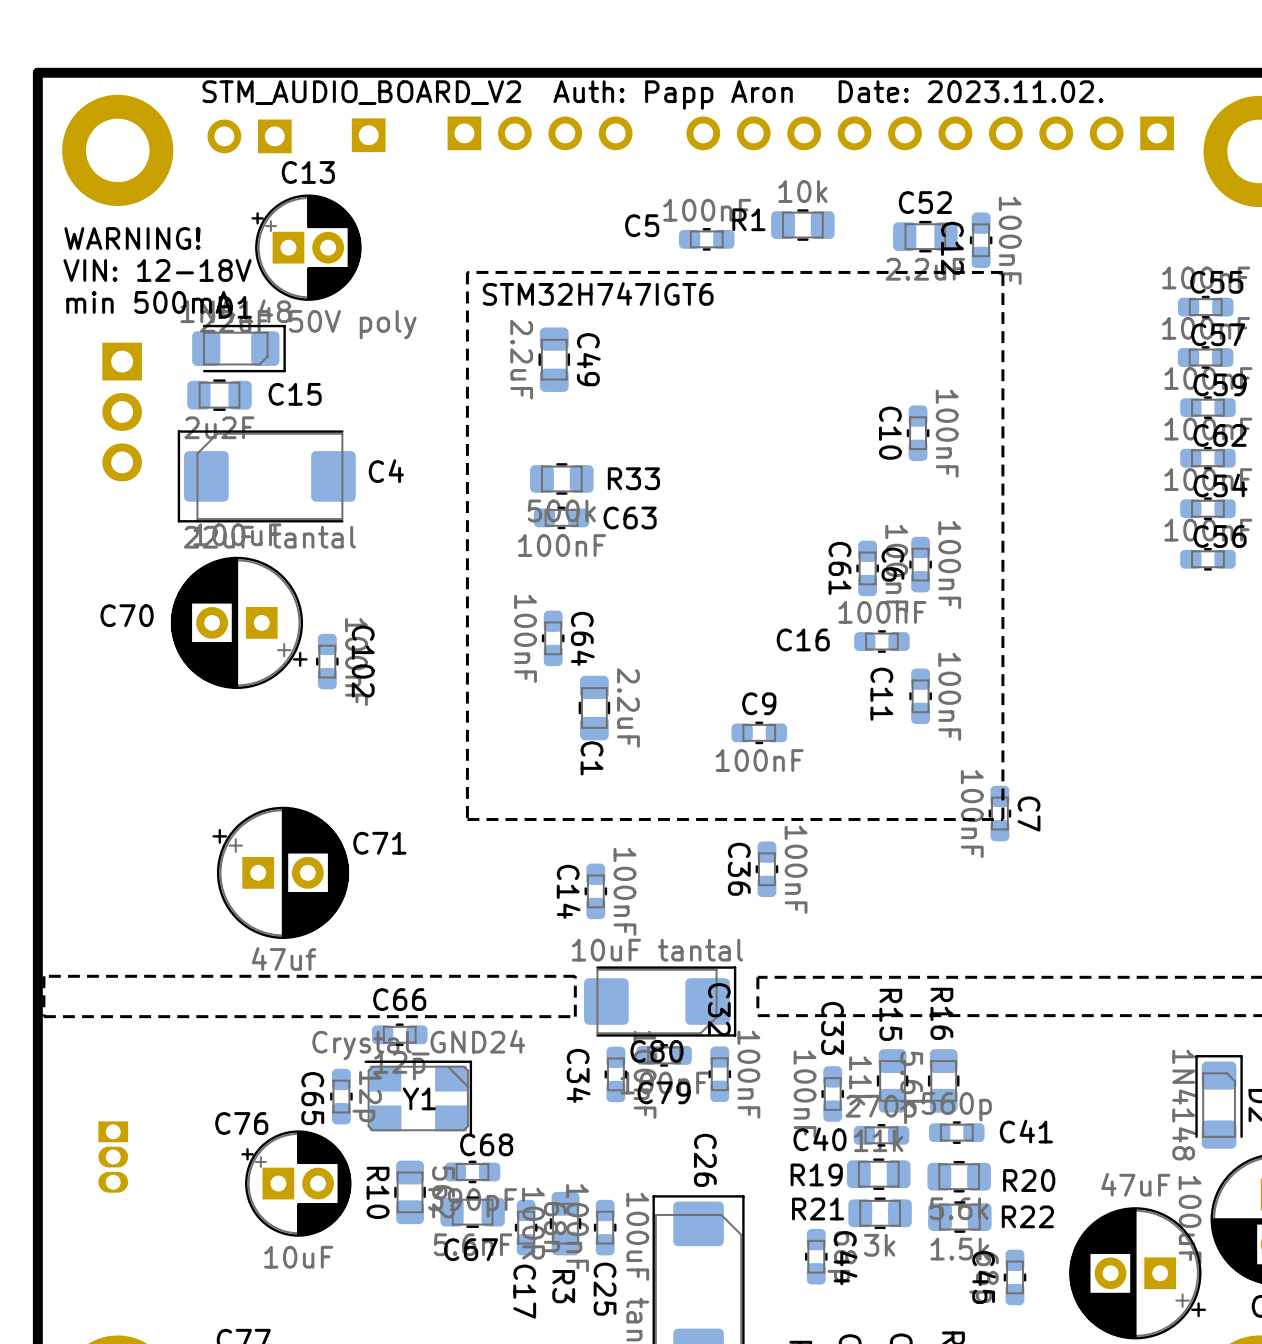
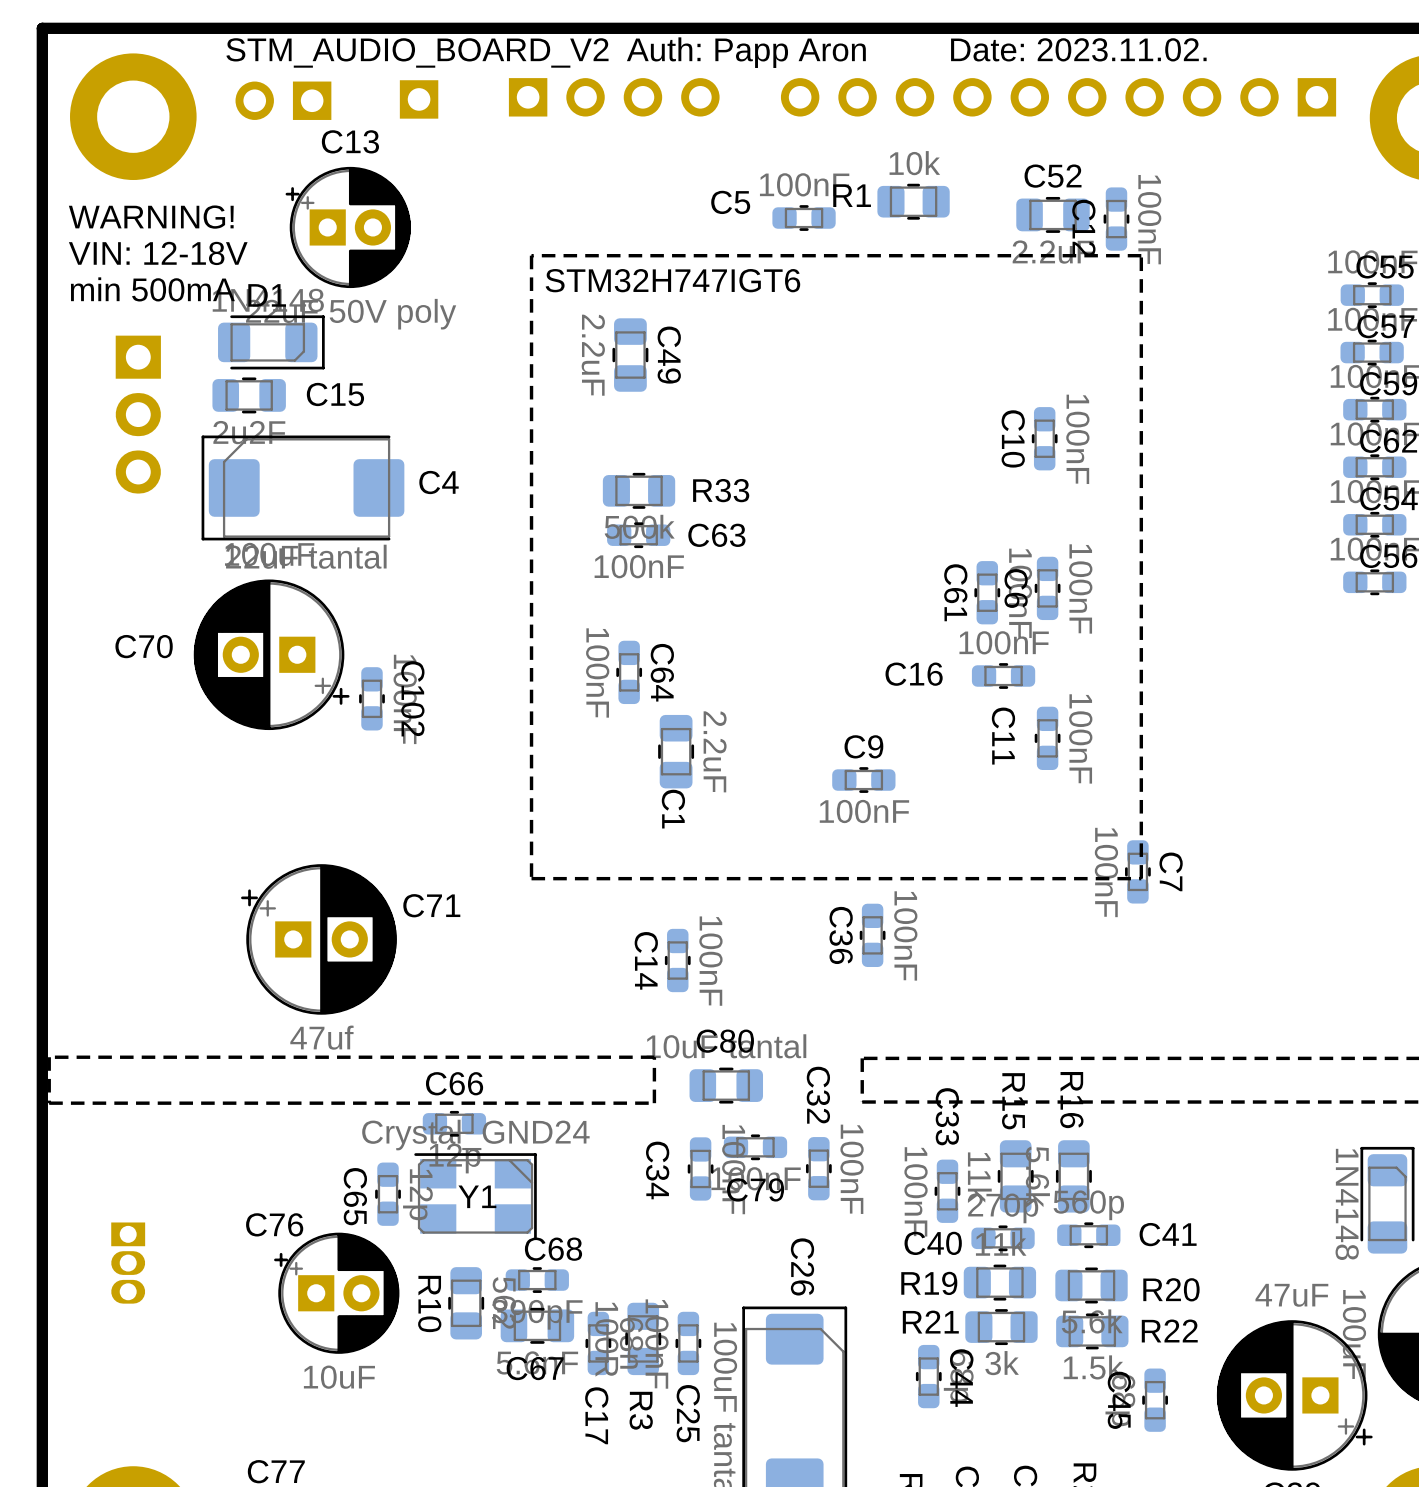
C80 footprint: [584, 966, 737, 1037] -> [689, 1067, 764, 1104]
C80 name position: C80 (657, 1051) -> C80 (725, 1041)

